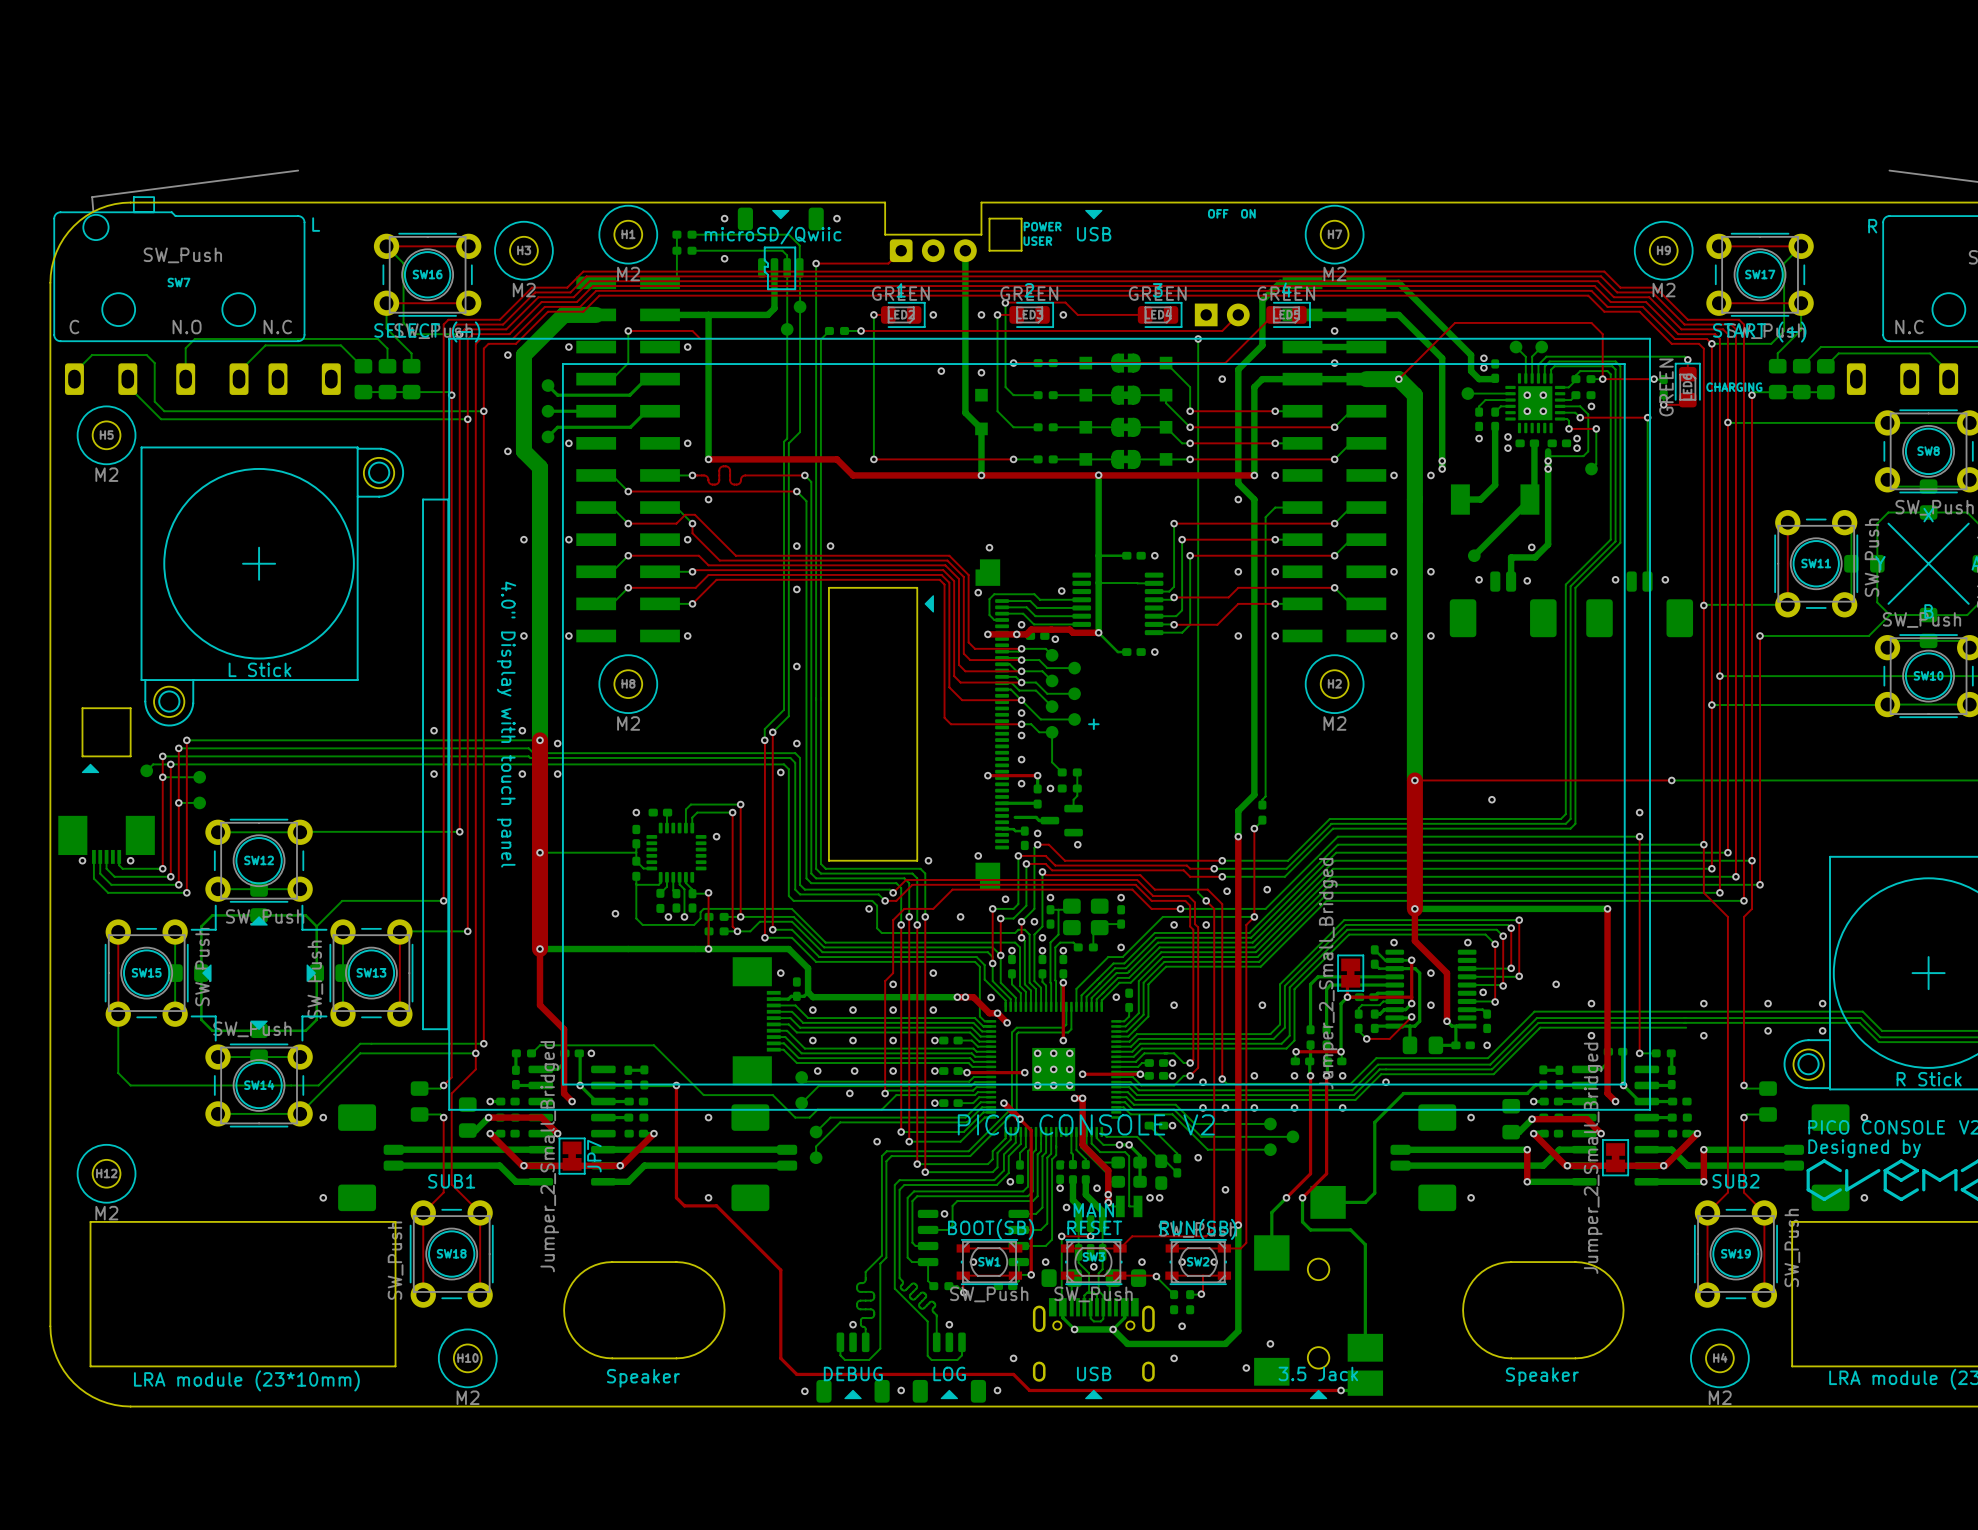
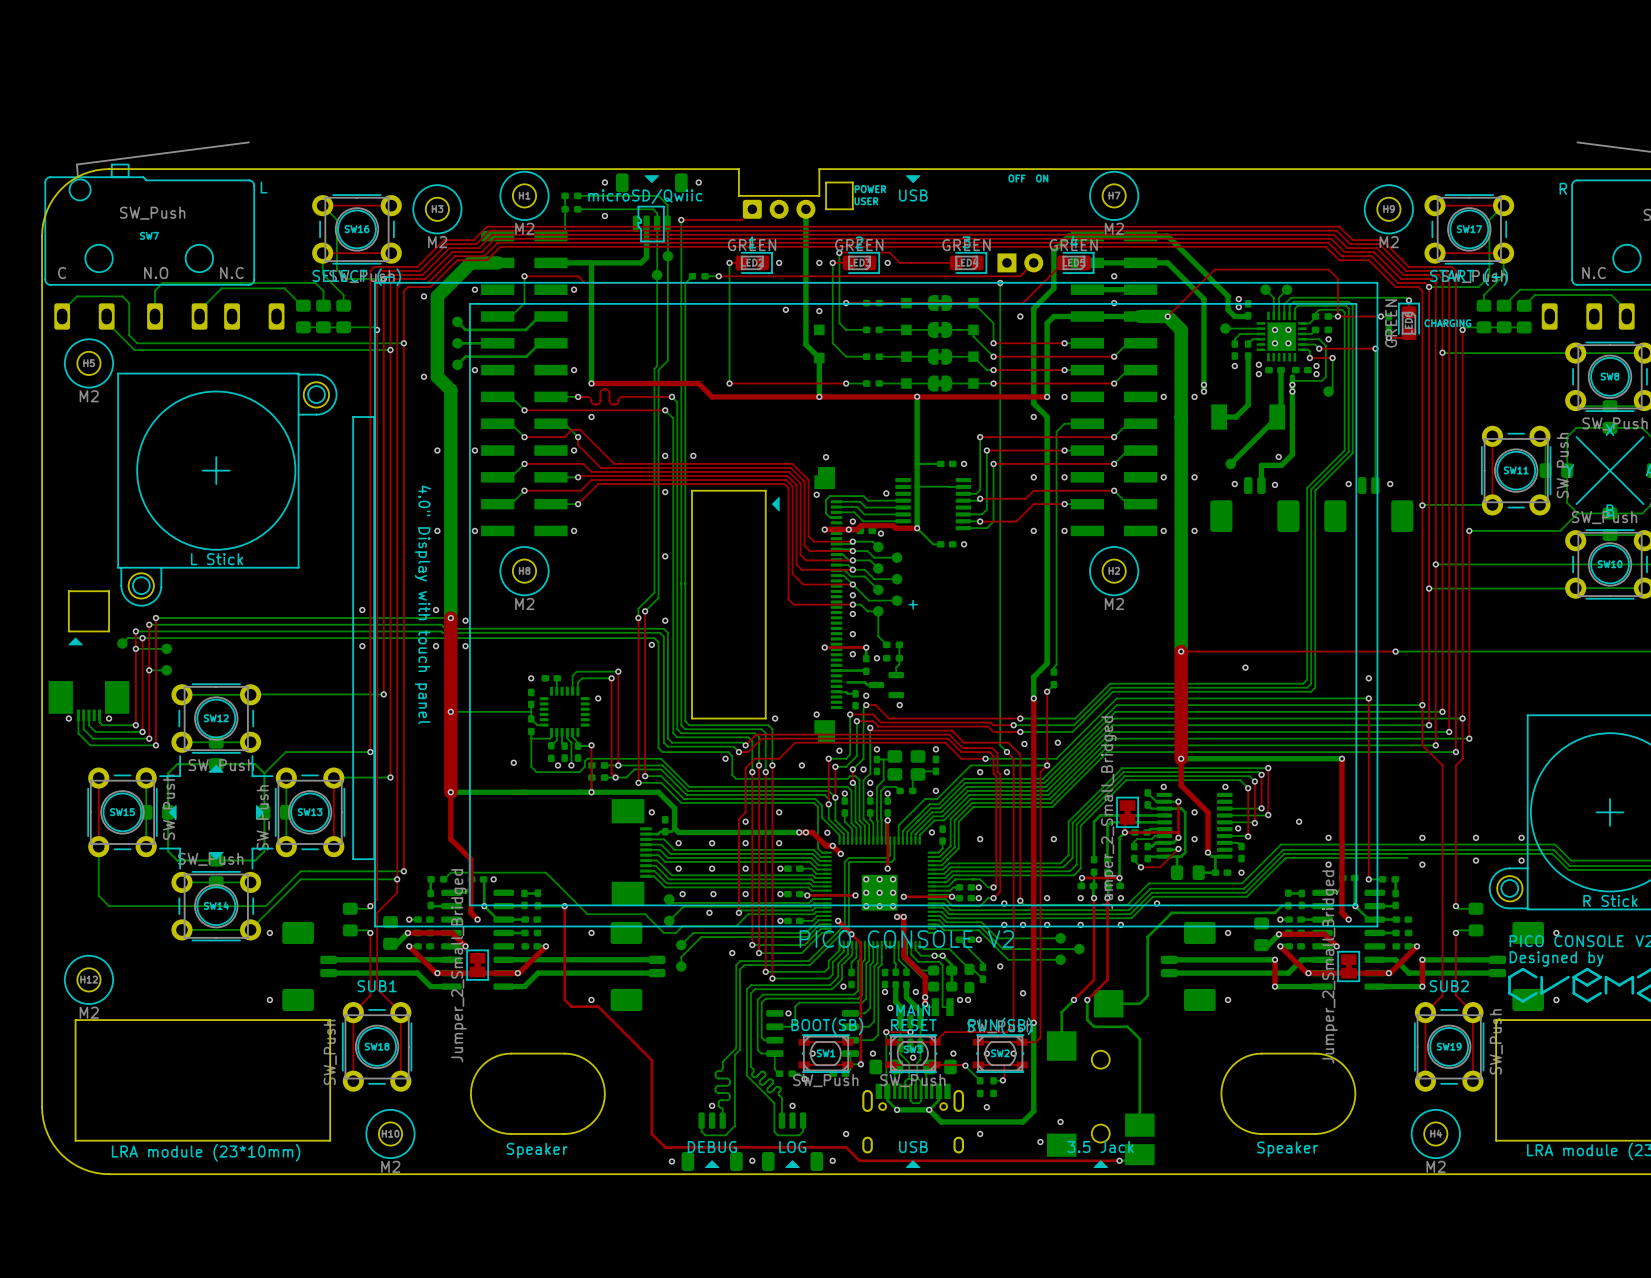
JP7 name: JP7 (594, 1156) -> none

